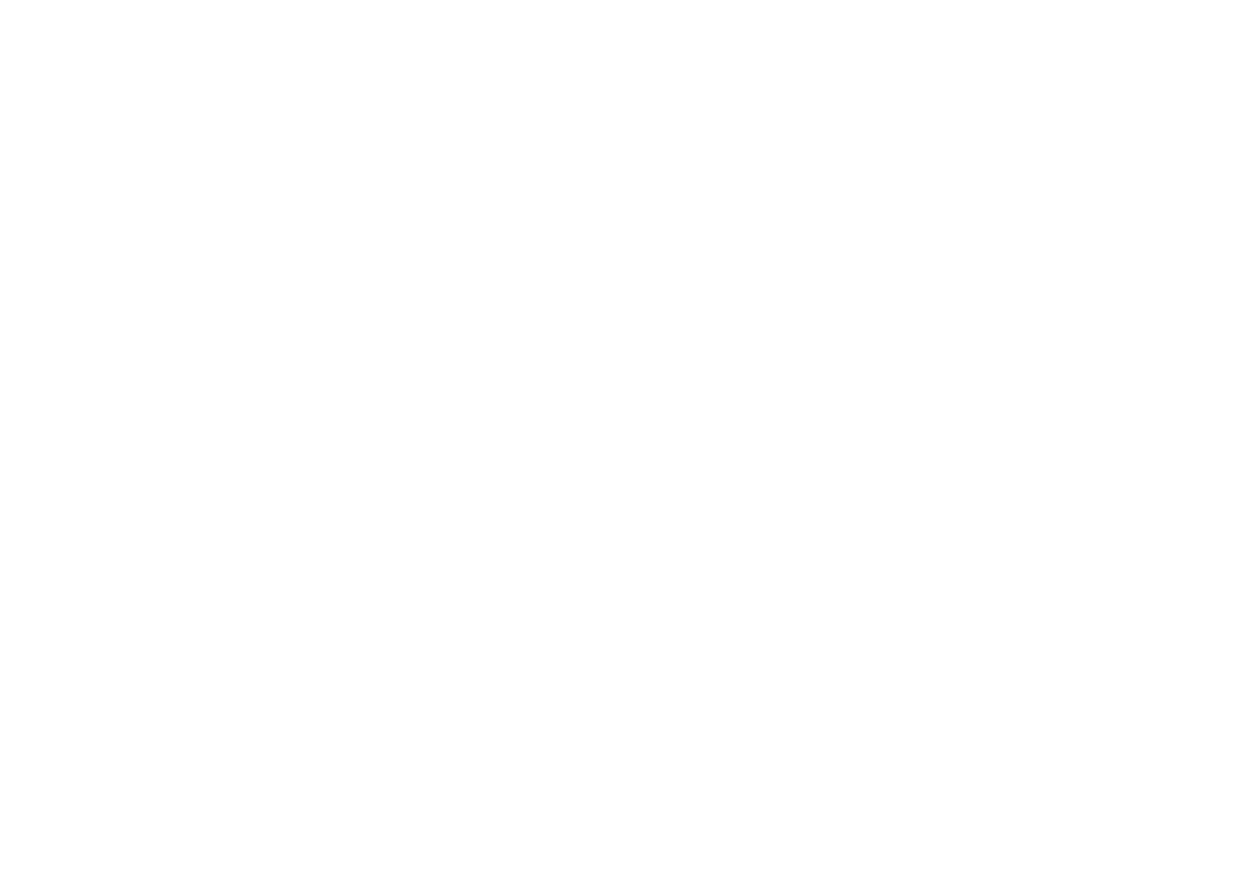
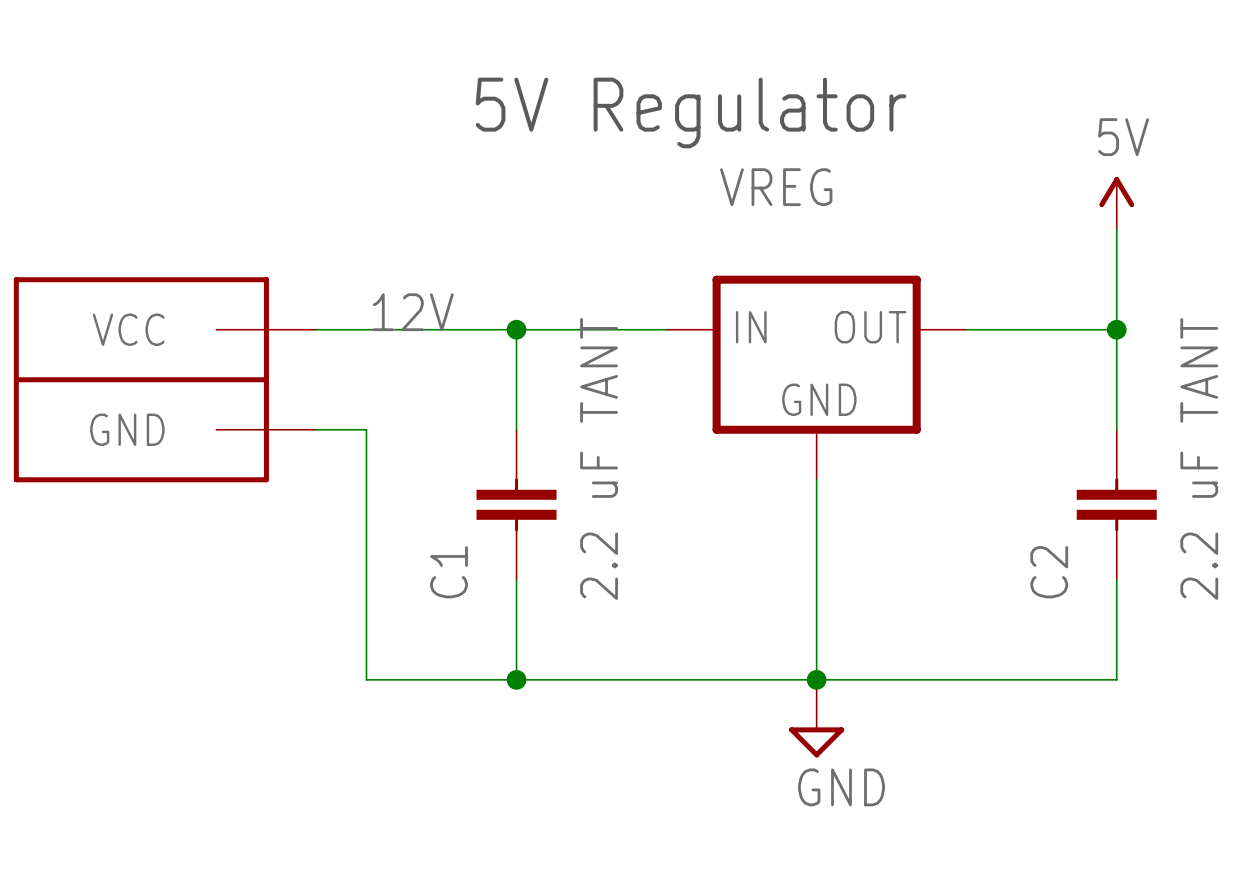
text: none -> 5V Regulator (691, 112)
power symbol: none -> 5V (1116, 203)
wire: none -> (1116, 229) (1116, 429)
label: none -> 12V (413, 312)
wire: none -> (316, 329) (666, 329)
wire: none -> (516, 329) (516, 429)
junction: none -> (516, 329)
wire: none -> (966, 329) (1116, 329)
junction: none -> (1116, 329)
VREG: none -> (816, 377)
part: none -> (165, 379)
wire: none -> (316, 429) (366, 429) (366, 679) (1116, 679) (1116, 579)
wire: none -> (816, 479) (816, 679)
C1: none -> 2.2 uF TANT (516, 504)
C2: none -> 2.2 uF TANT (1116, 504)
wire: none -> (516, 579) (516, 679)
junction: none -> (516, 679)
junction: none -> (816, 679)
power symbol: none -> GND (816, 718)

